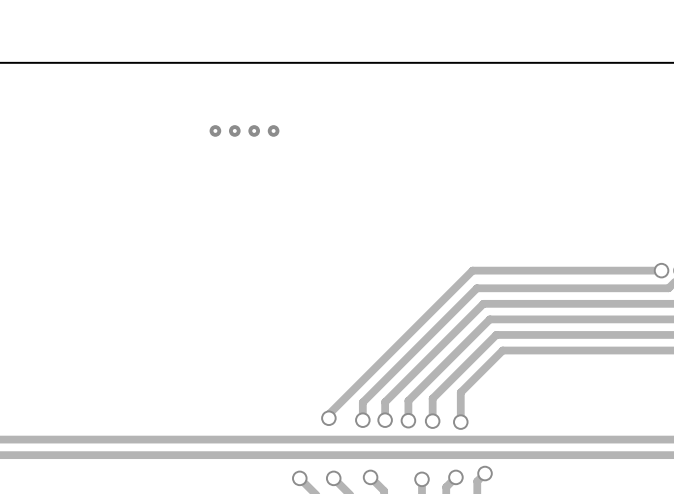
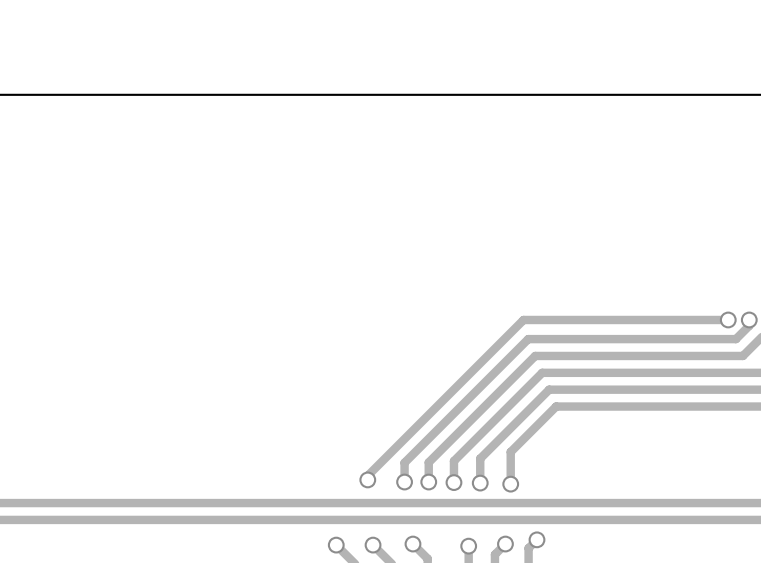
via: (215, 130) -> none
via: (234, 130) -> none
via: (254, 130) -> none
via: (273, 130) -> none

